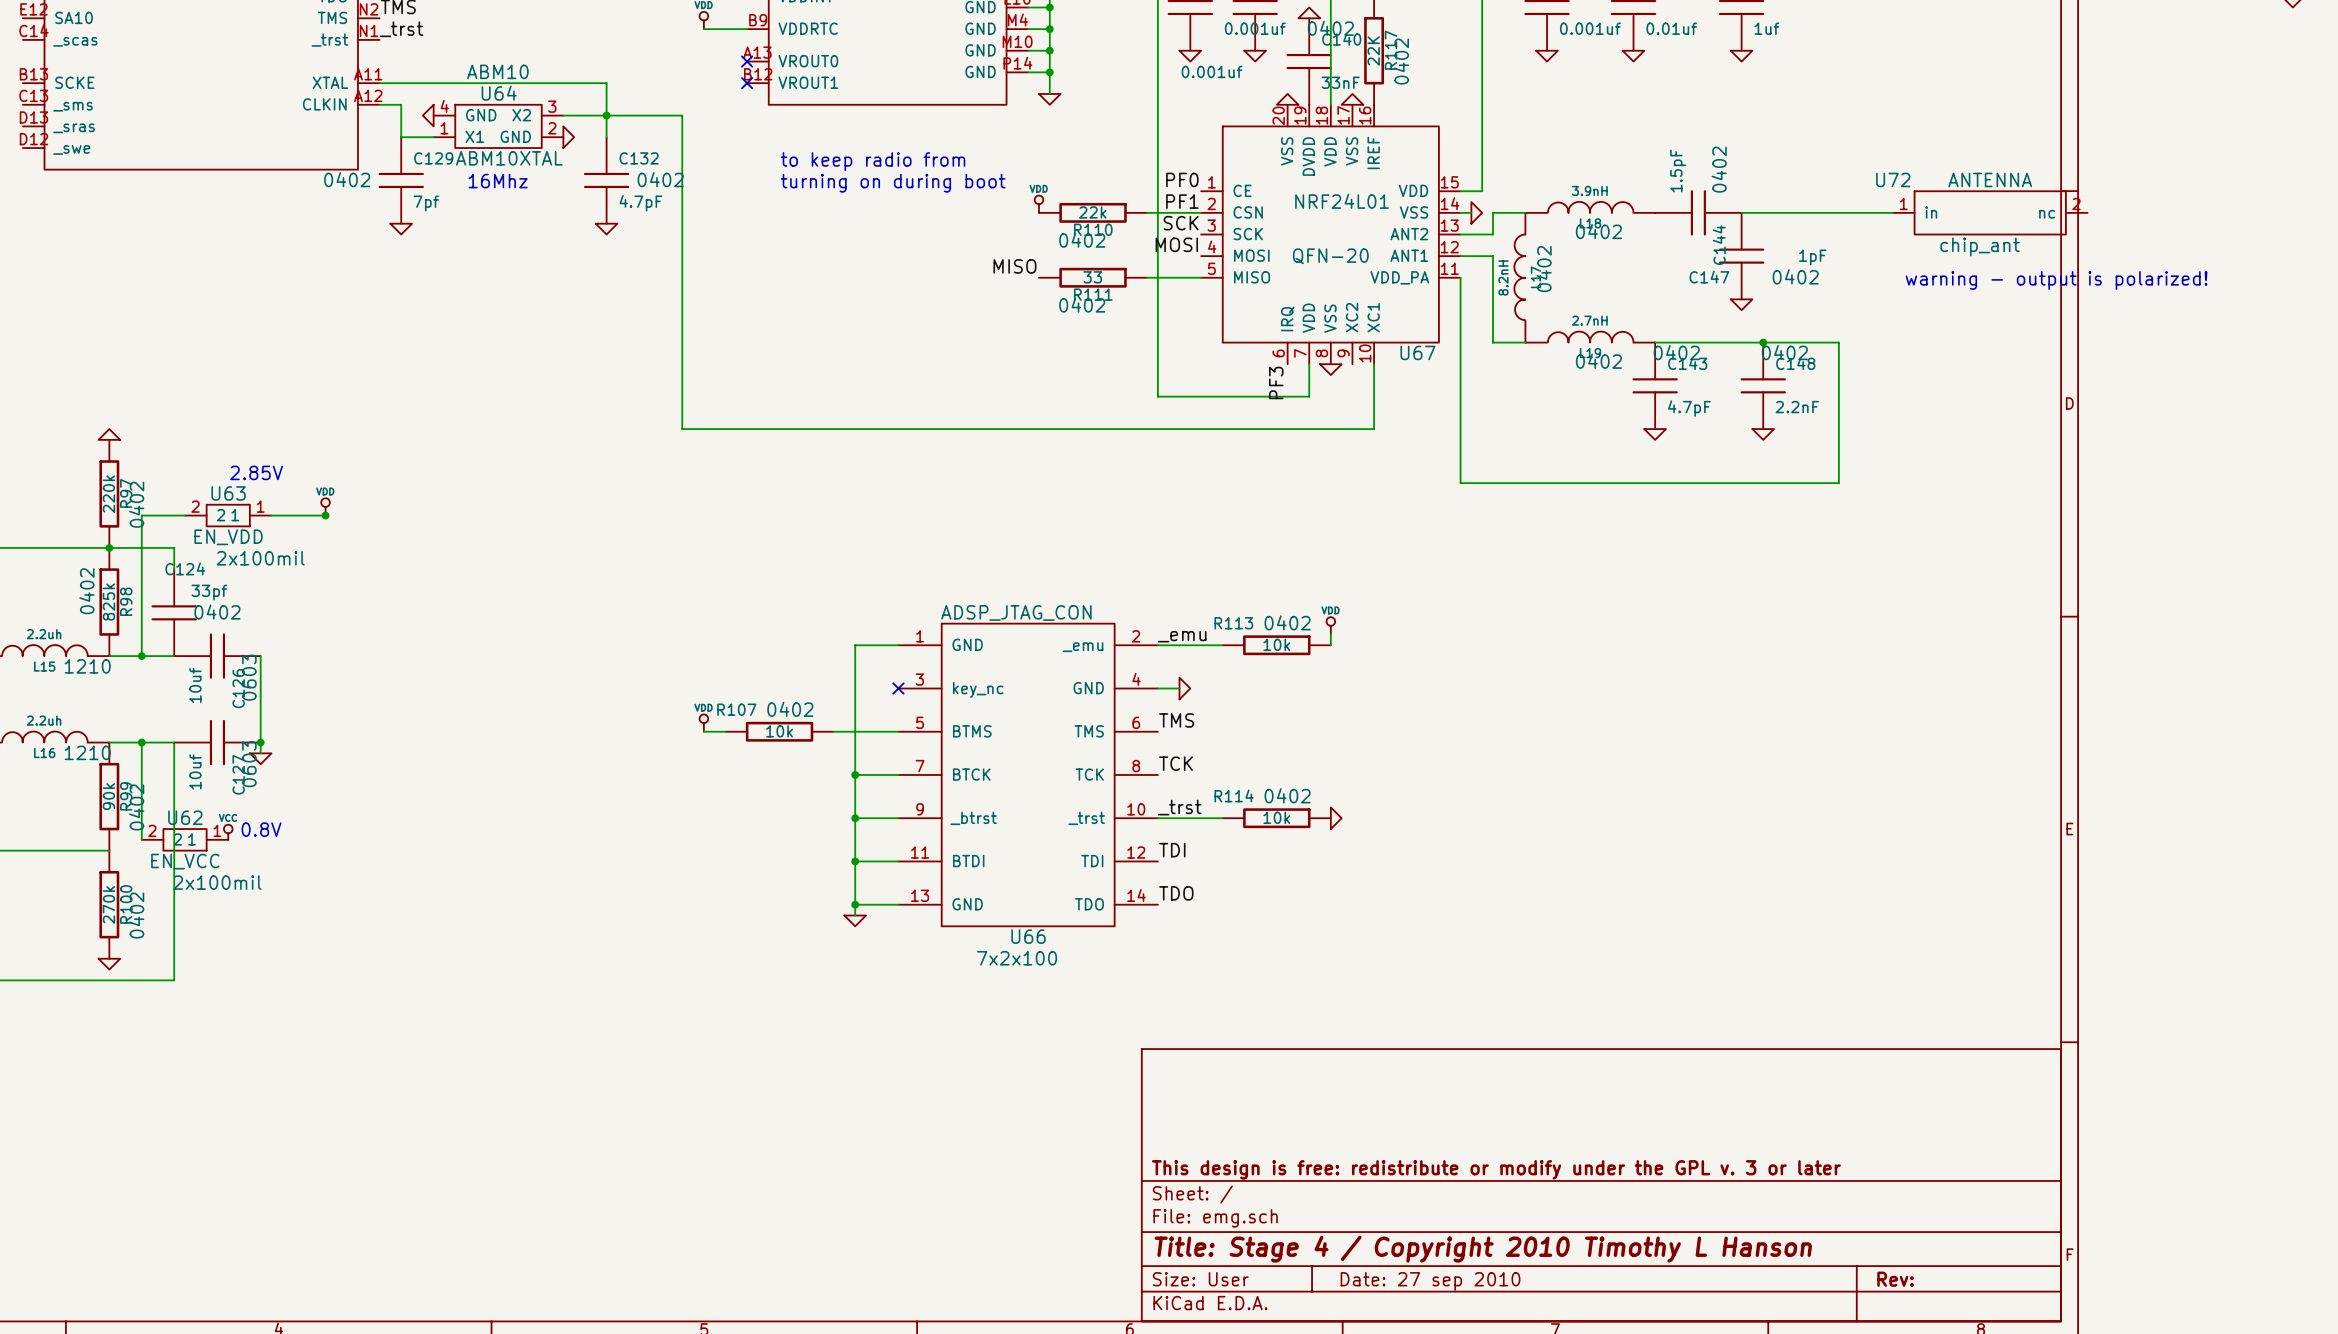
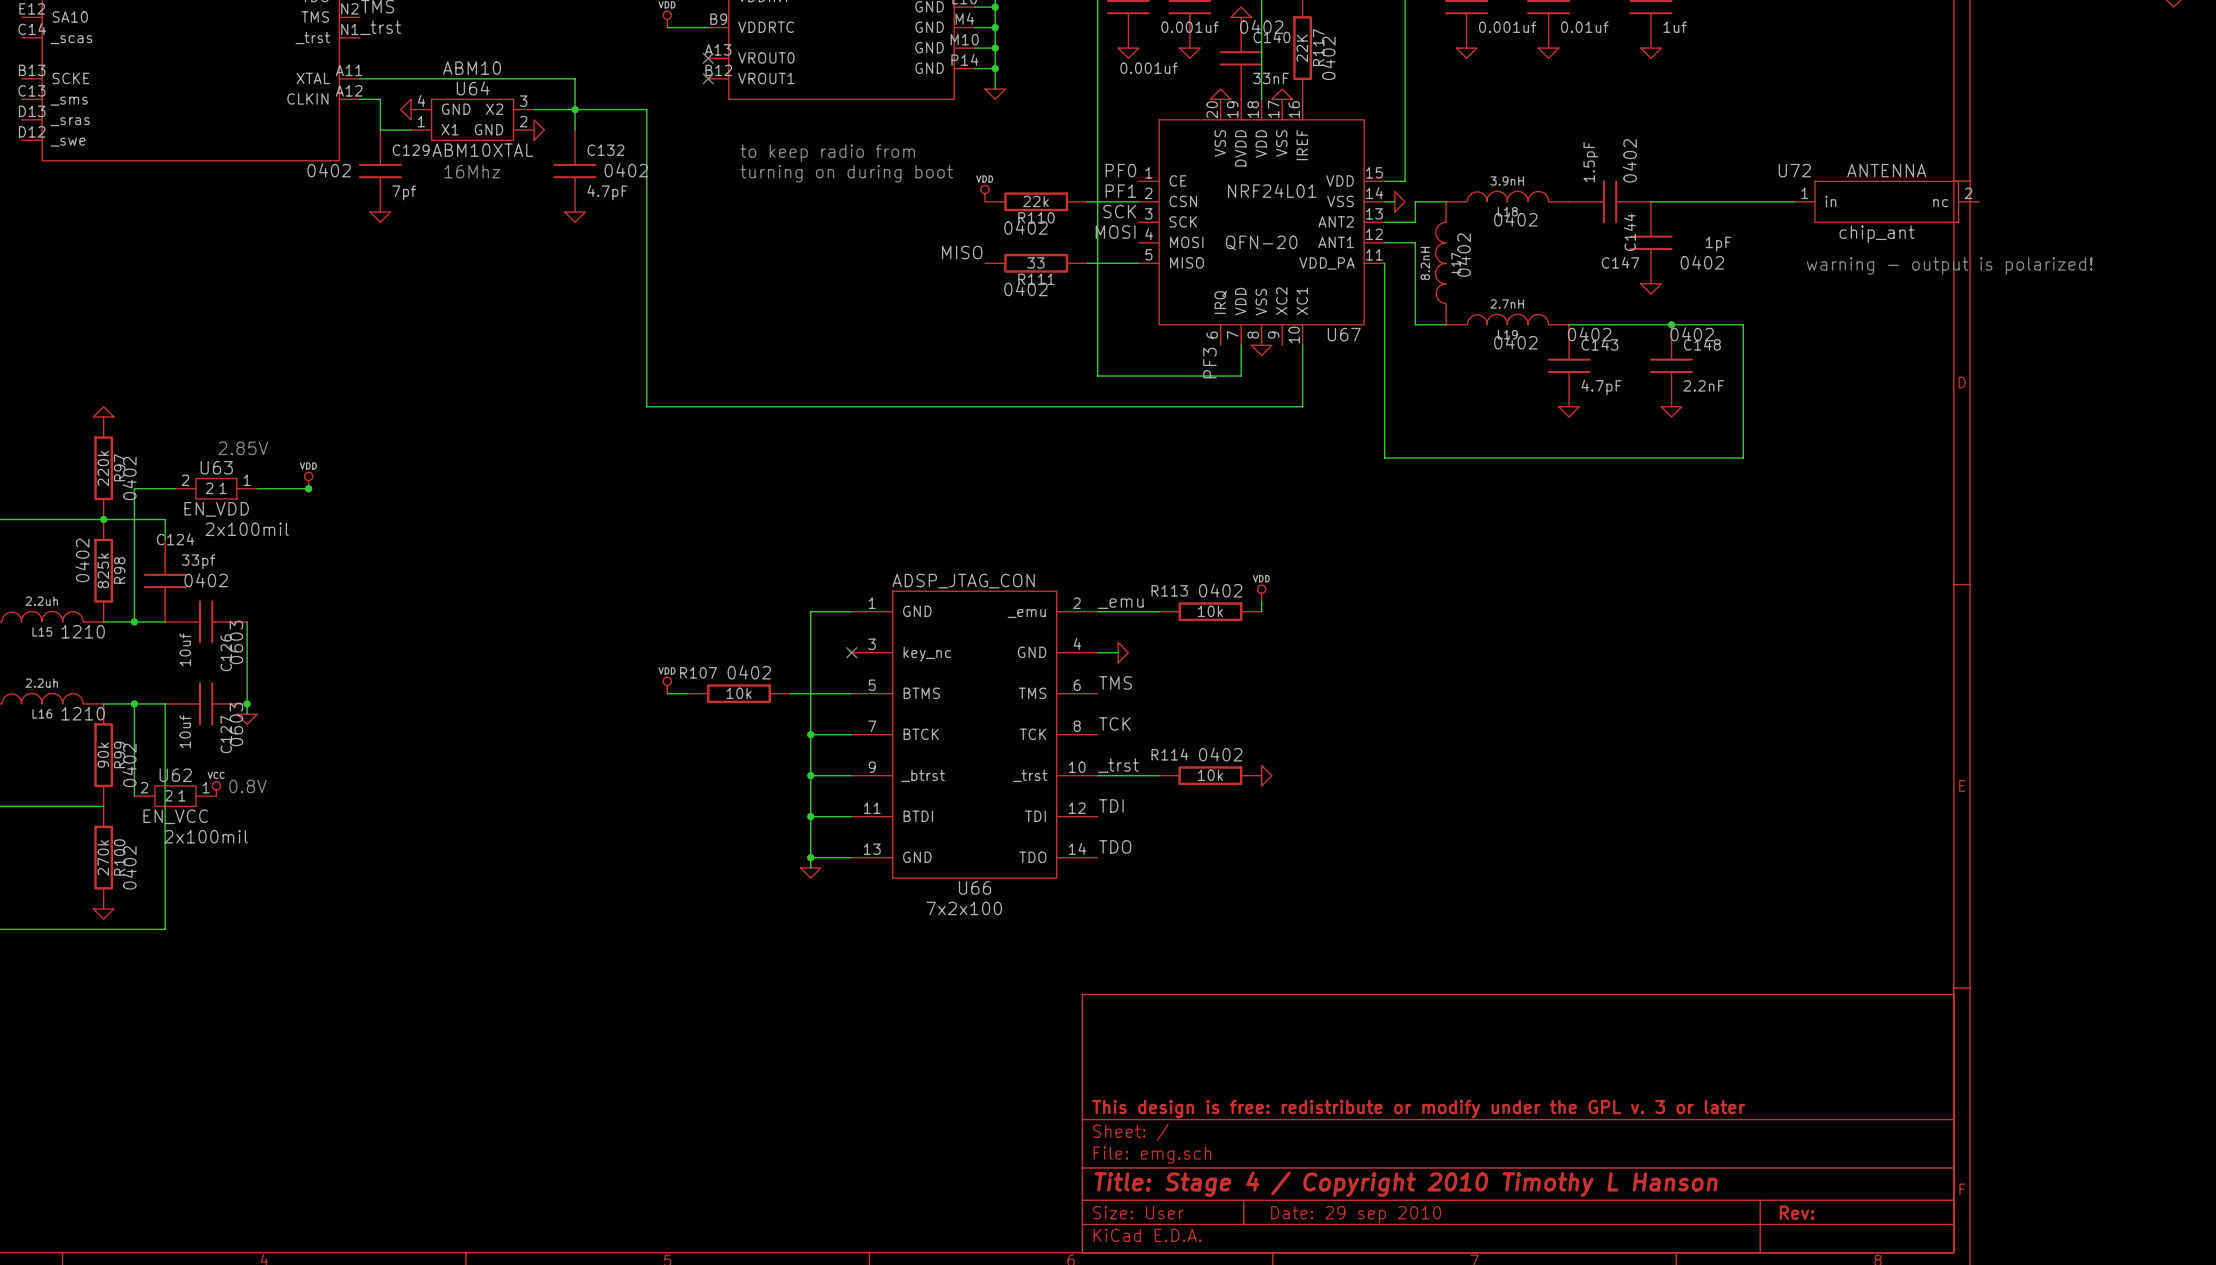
title block: Date: 27 sep 2010 (1430, 1281) -> Date: 29 sep 2010 (1356, 1214)

